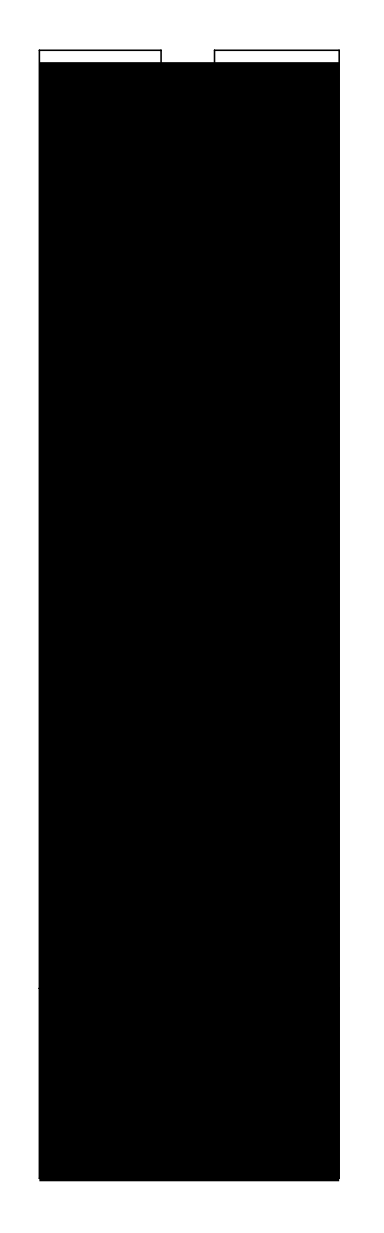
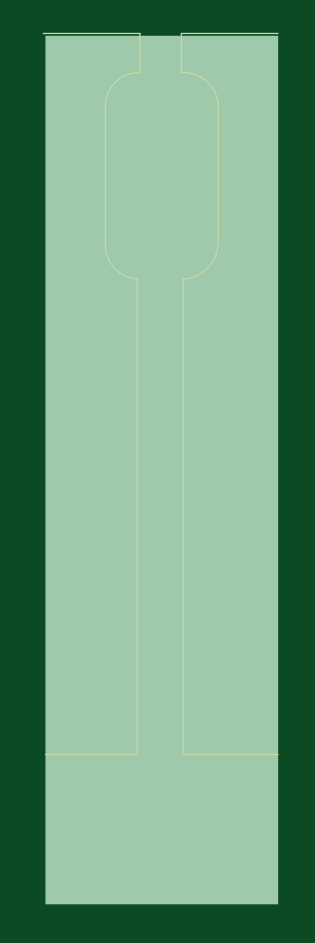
board edge: none -> (139, 33) (43, 33)
board edge: (214, 59) (214, 50) (339, 50) (339, 1178) (39, 1178) (39, 50) (161, 50) (161, 59) -> (181, 33) (278, 33)
drawing shape: [39, 62, 340, 1182] -> [45, 35, 279, 905]

